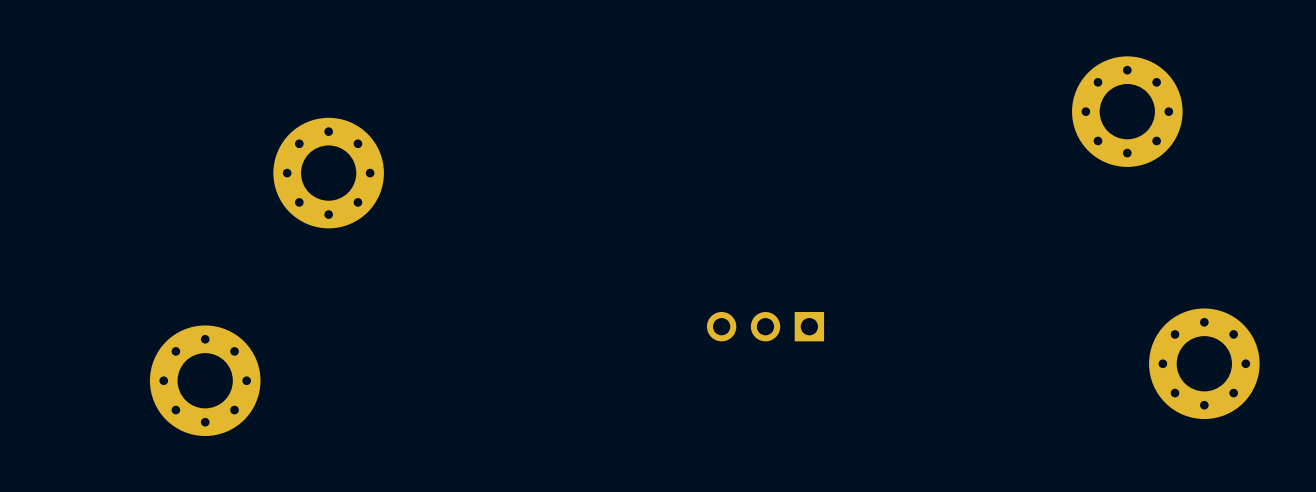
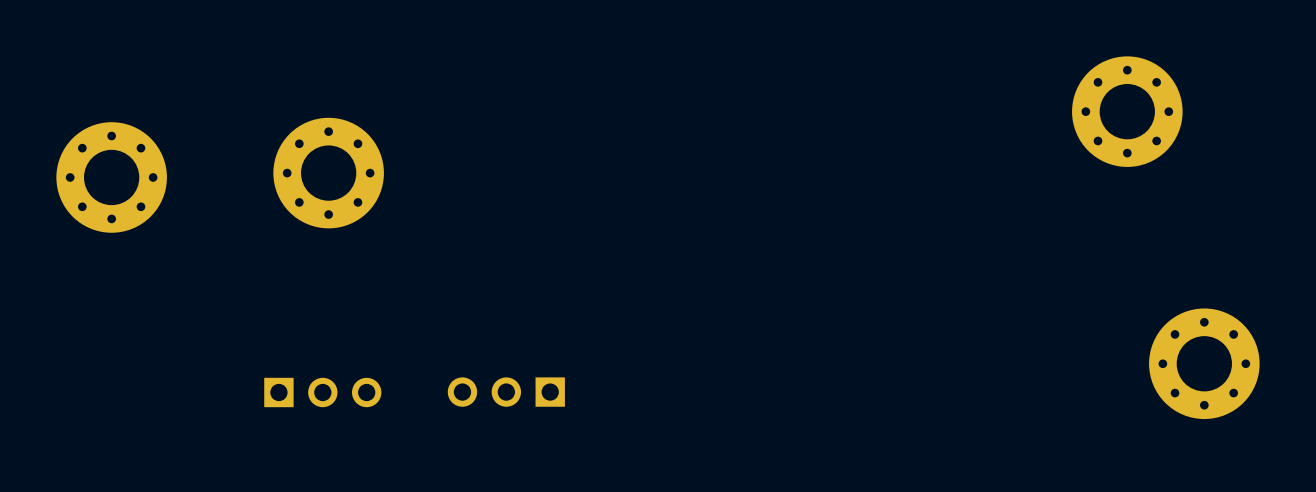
part: (765, 326) -> none
part position: (205, 380) -> (111, 177)
part: none -> (322, 392)
part: none -> (506, 392)

